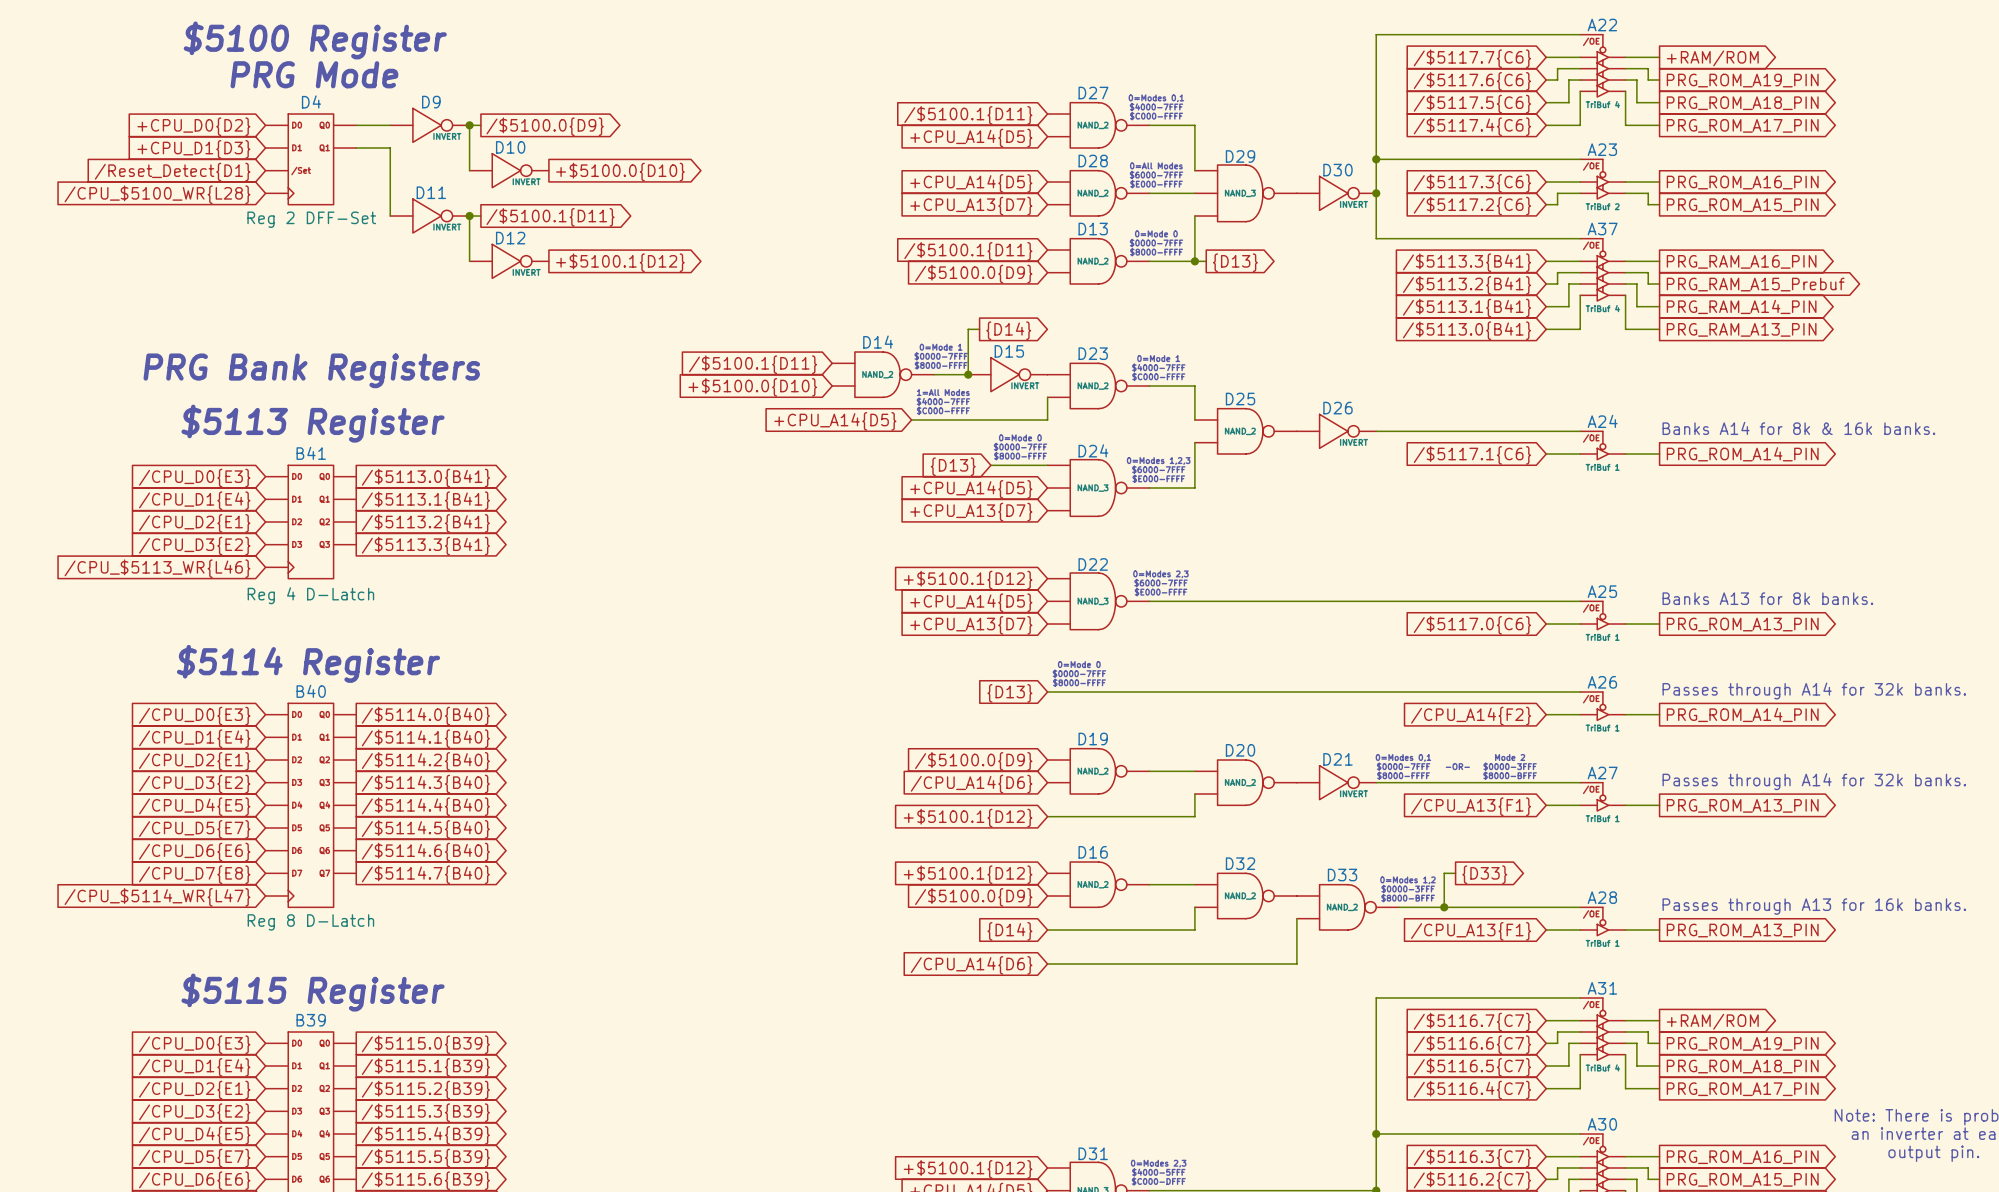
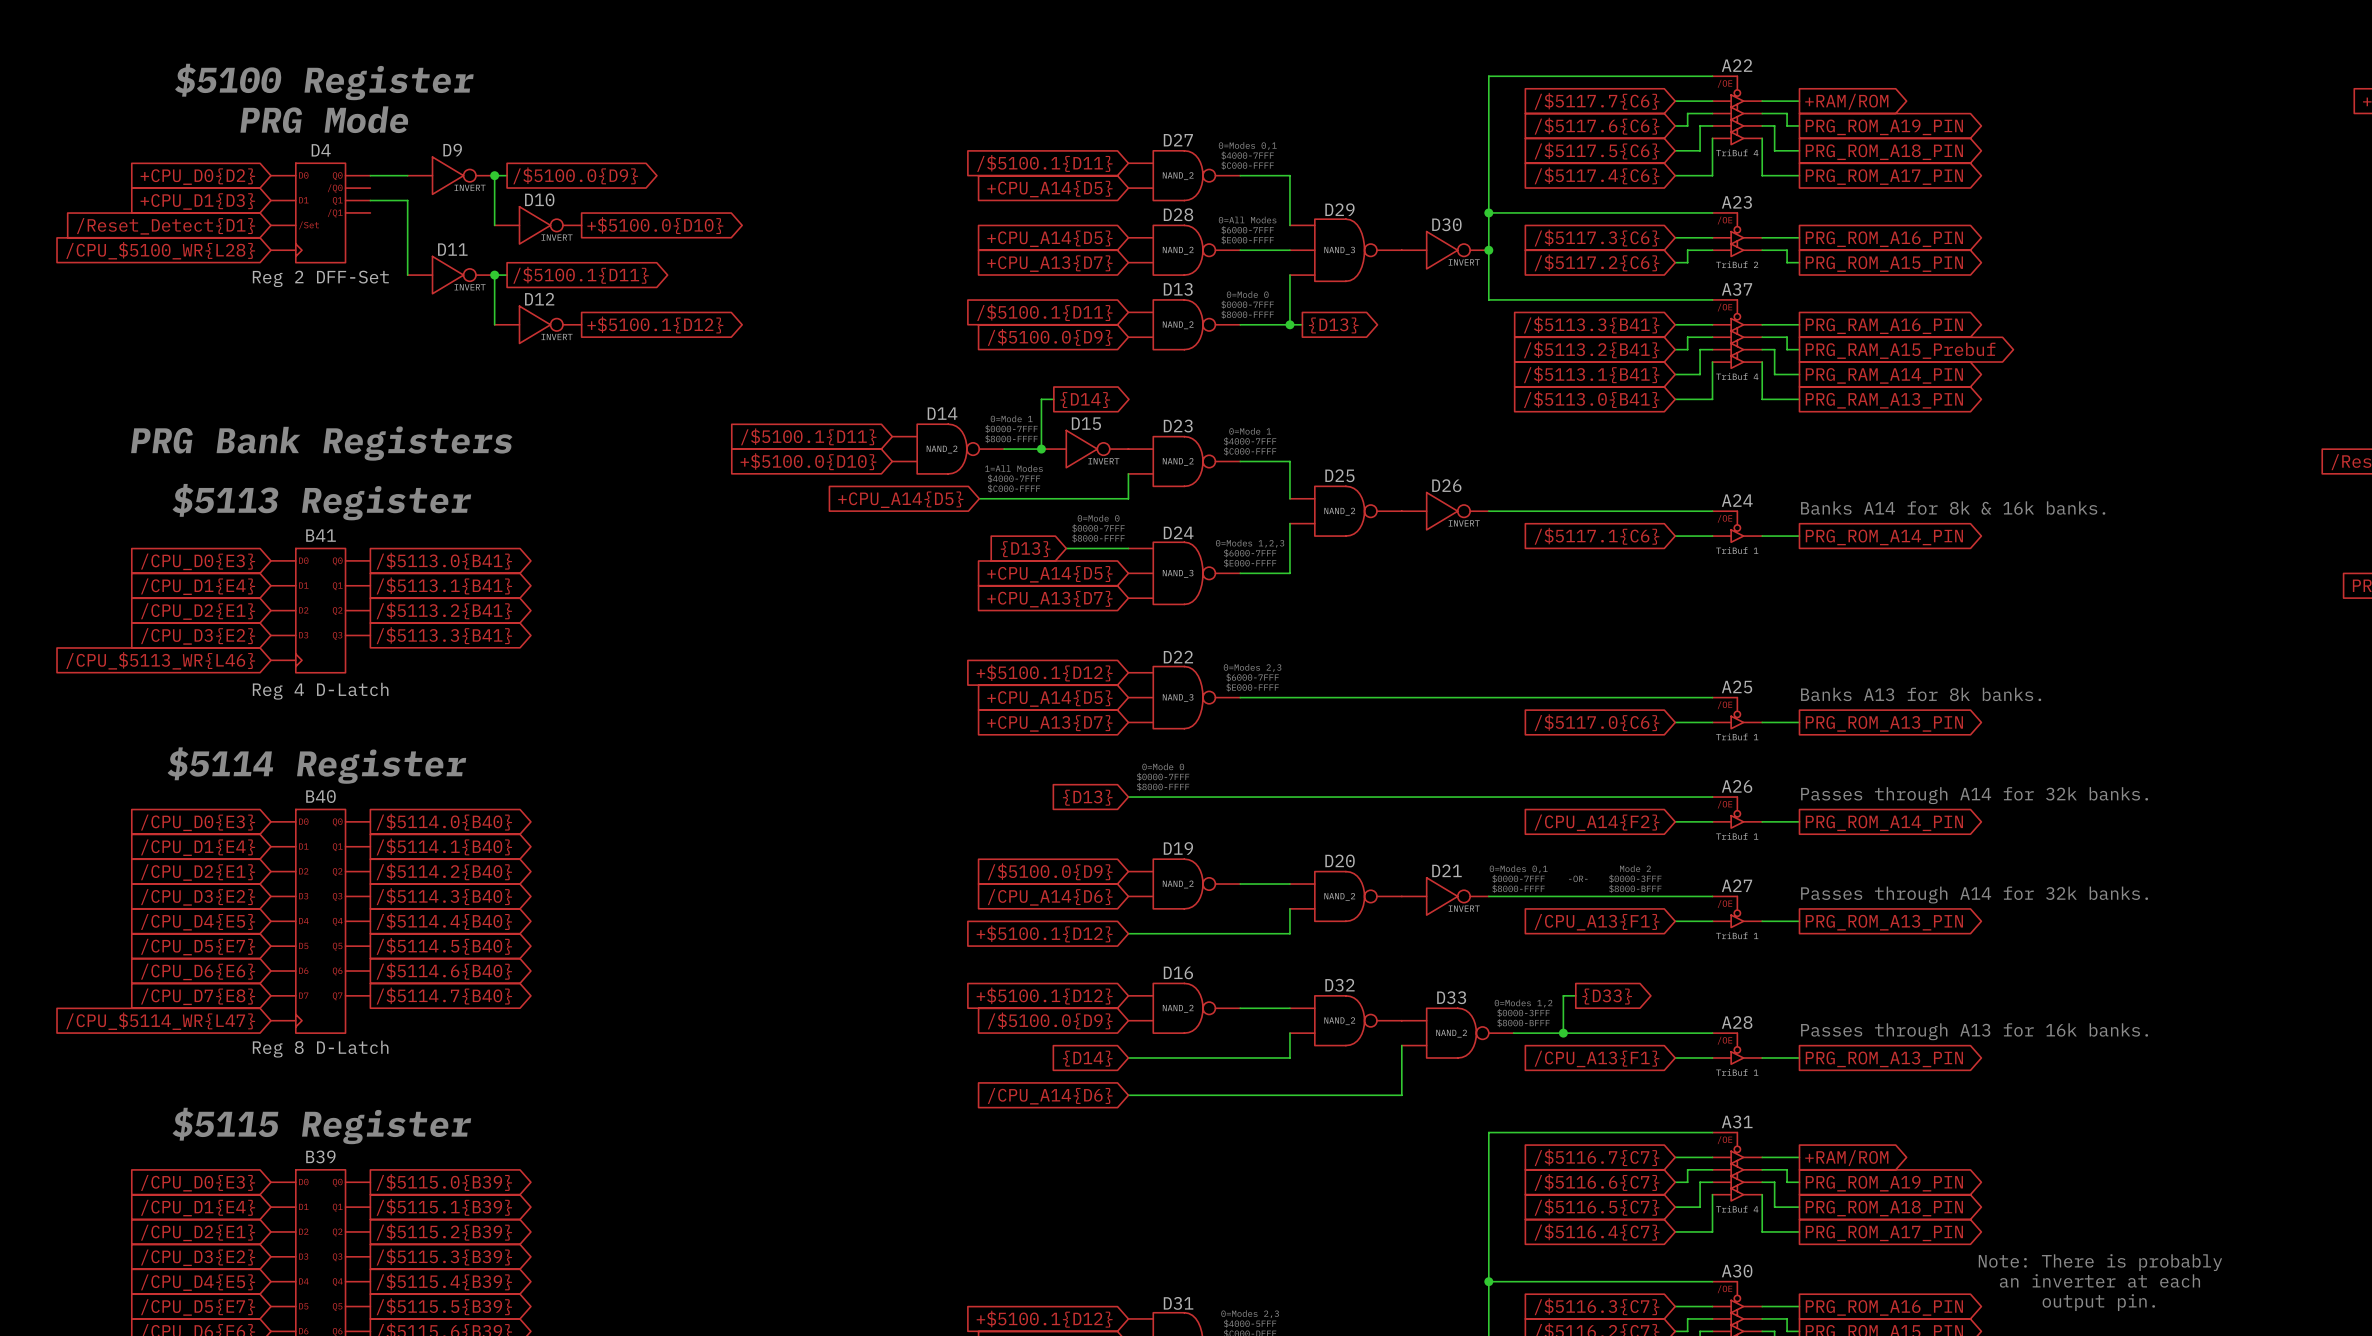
D4 symbol: [265, 114, 357, 205] -> [270, 163, 371, 263]

